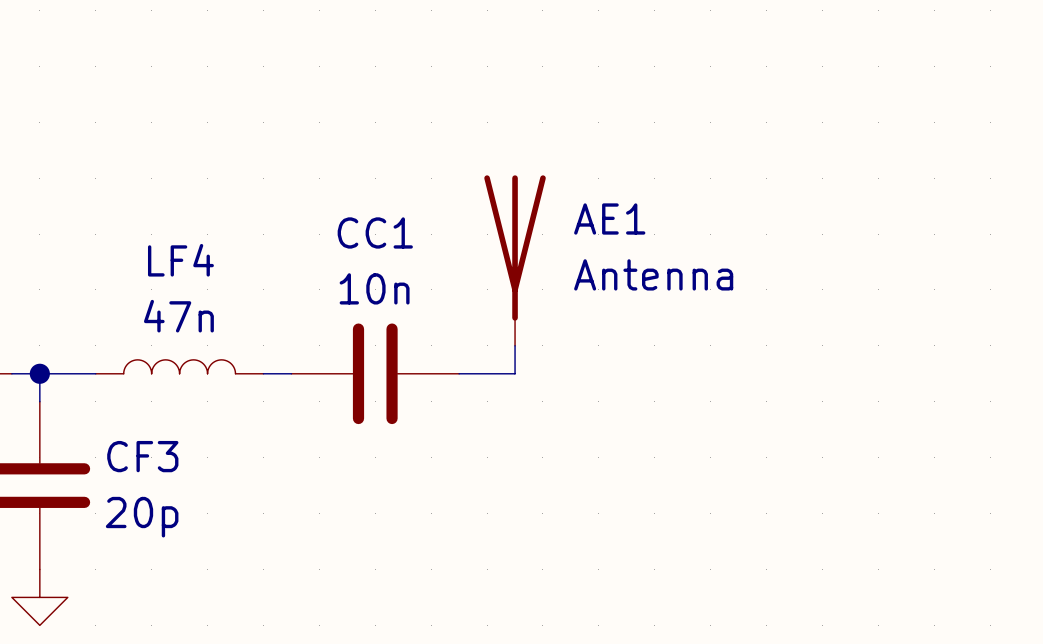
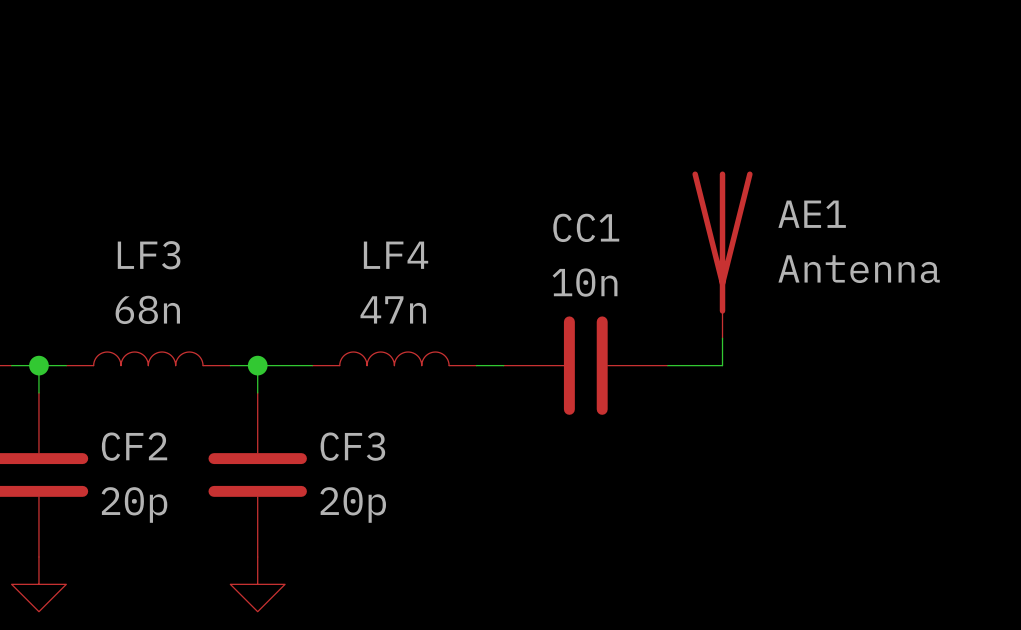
AE1 position: (515, 260) -> (722, 254)
wire: (515, 345) (515, 373) -> none
wire: none -> (722, 338) (722, 365) (667, 365)
LF3: none -> 68n (148, 358)
LF4 position: (179, 366) -> (394, 358)
wire: none -> (230, 365) (257, 365) (257, 392)
junction: none -> (257, 365)
CC1 position: (375, 373) -> (585, 365)
CF3 name: CF3 (142, 456) -> CF2 (134, 446)
CF3: none -> 20p (257, 474)
power symbol: none -> (257, 584)

